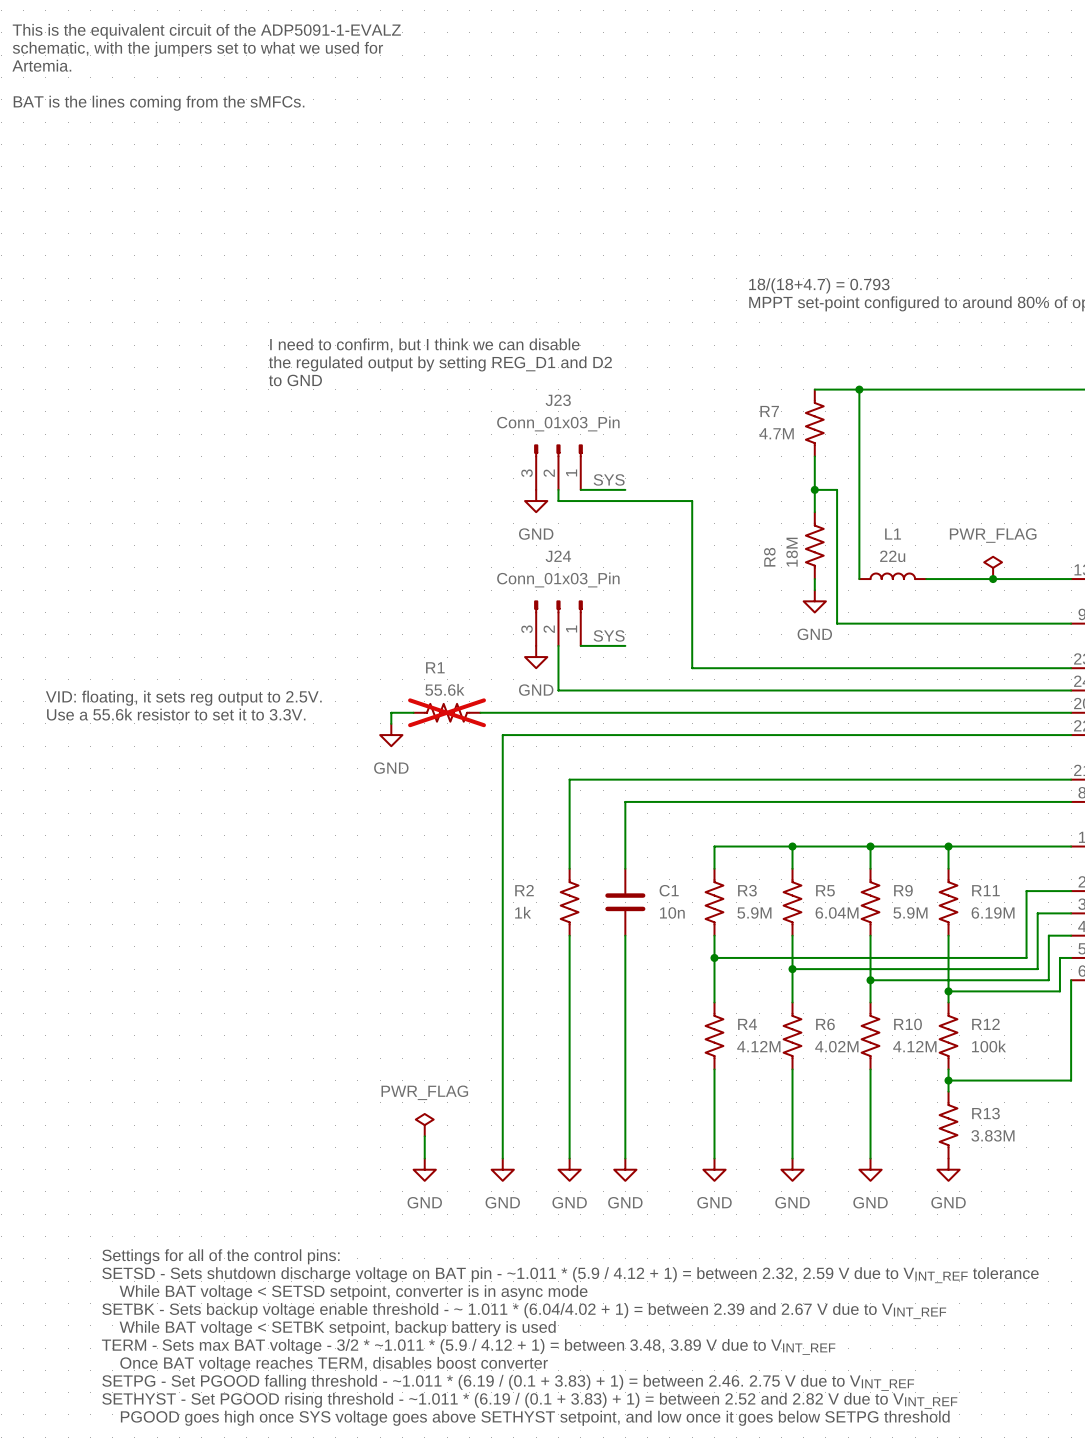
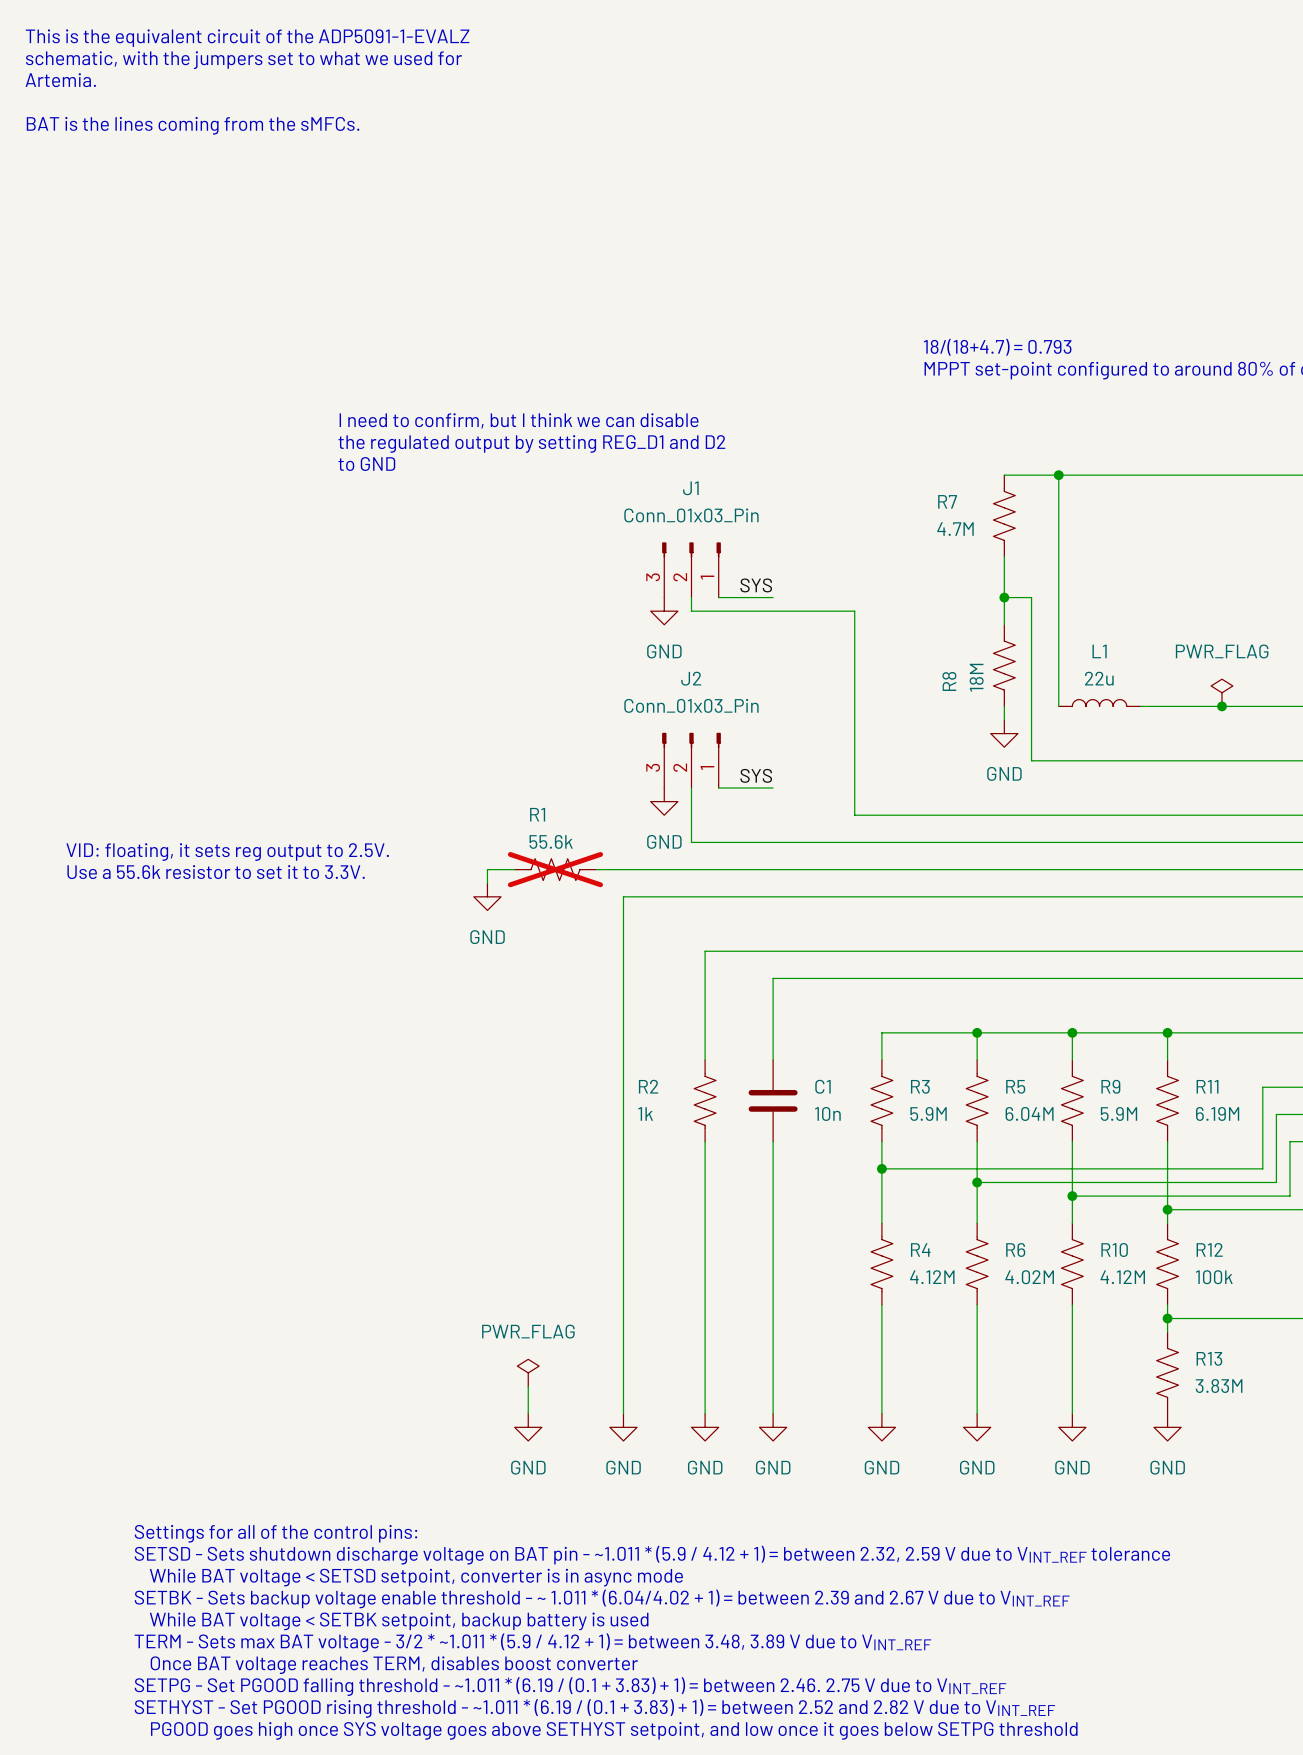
J23 name: J23 (558, 400) -> J1 (690, 488)
J24 name: J24 (558, 556) -> J2 (691, 678)

